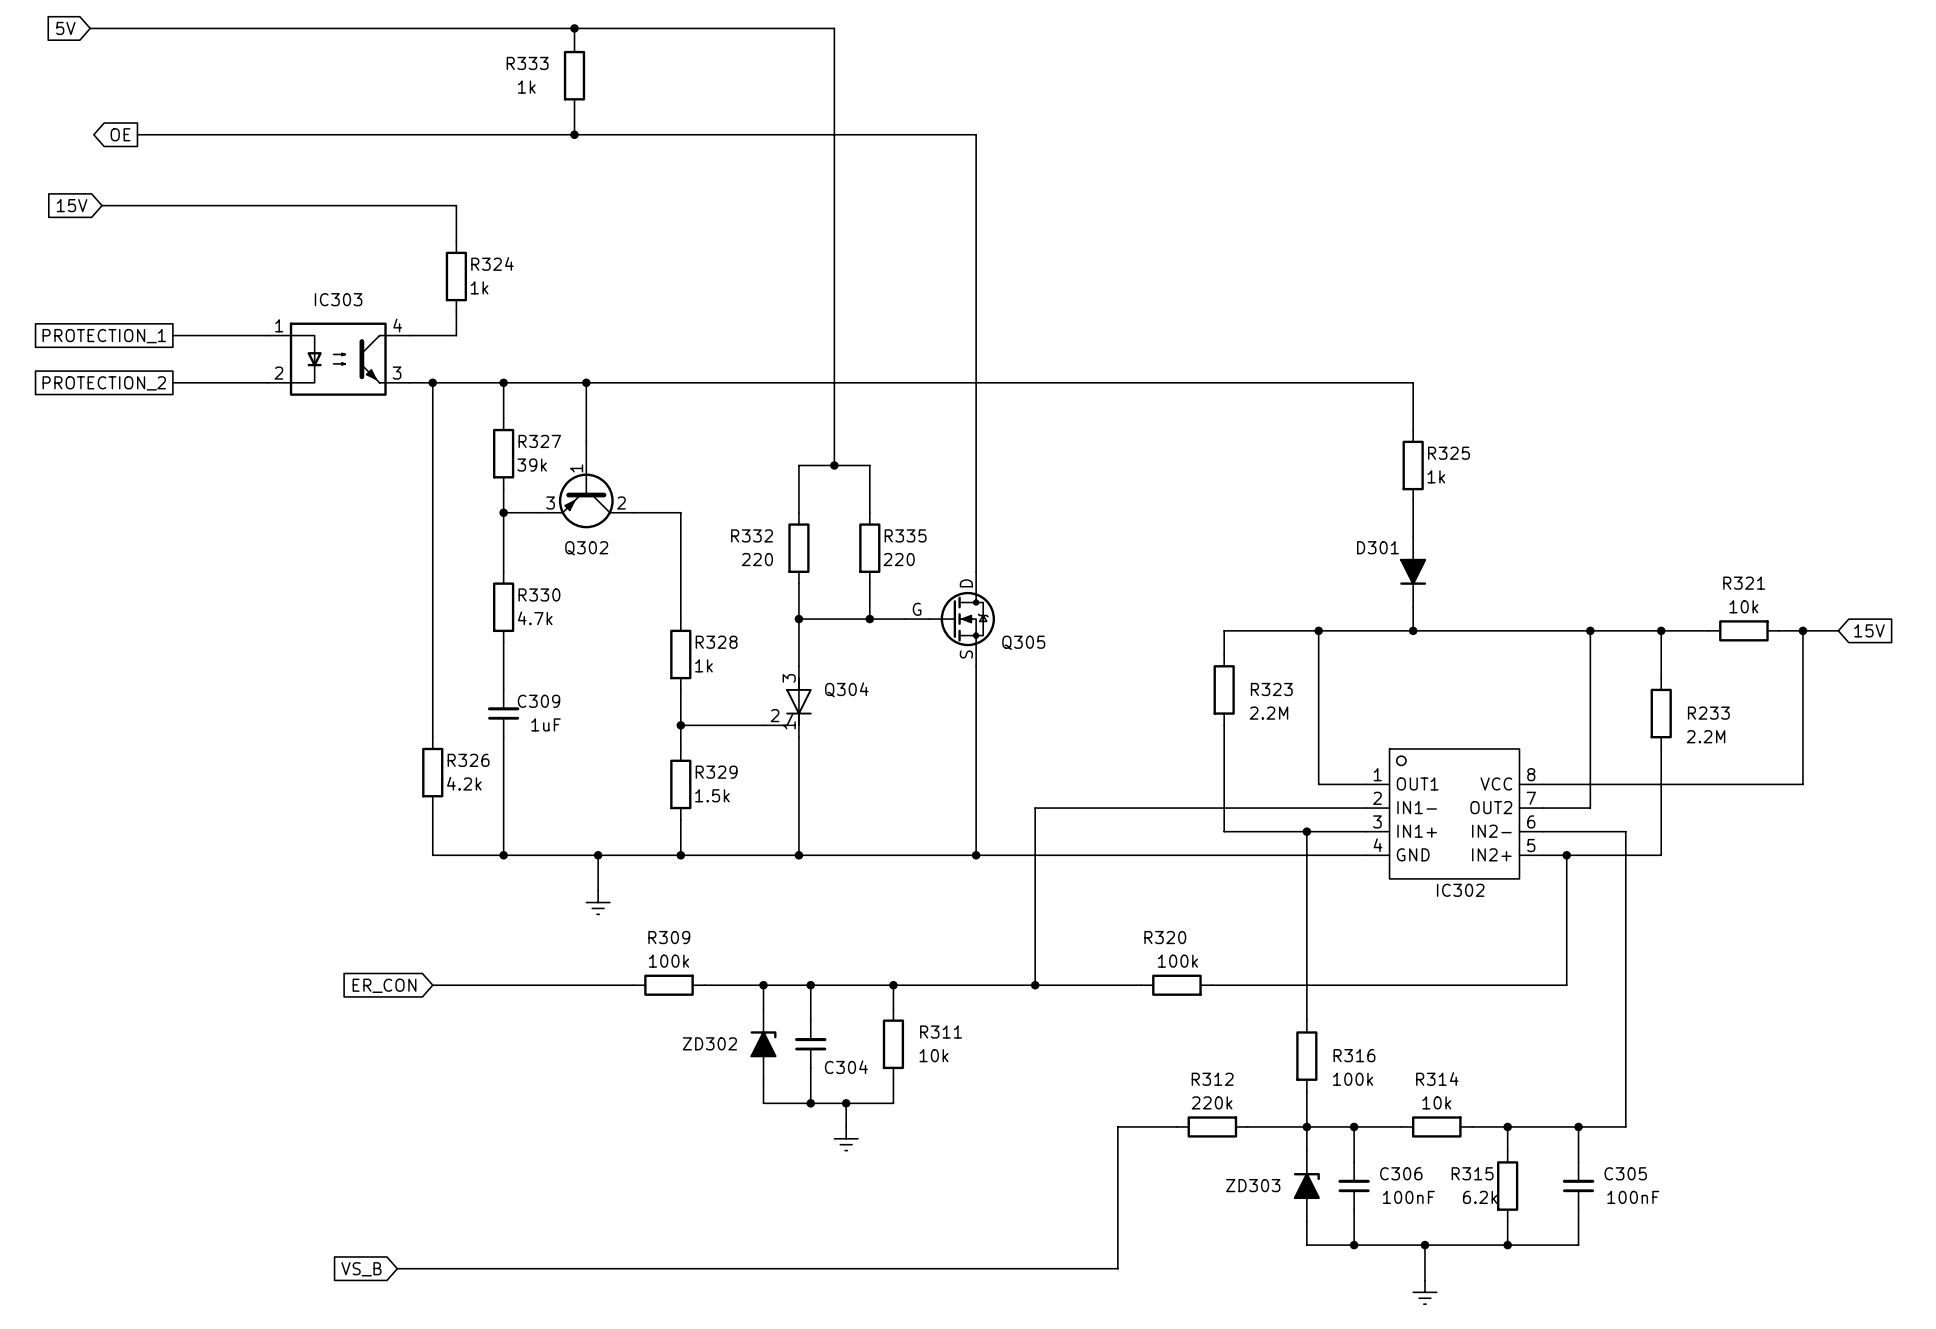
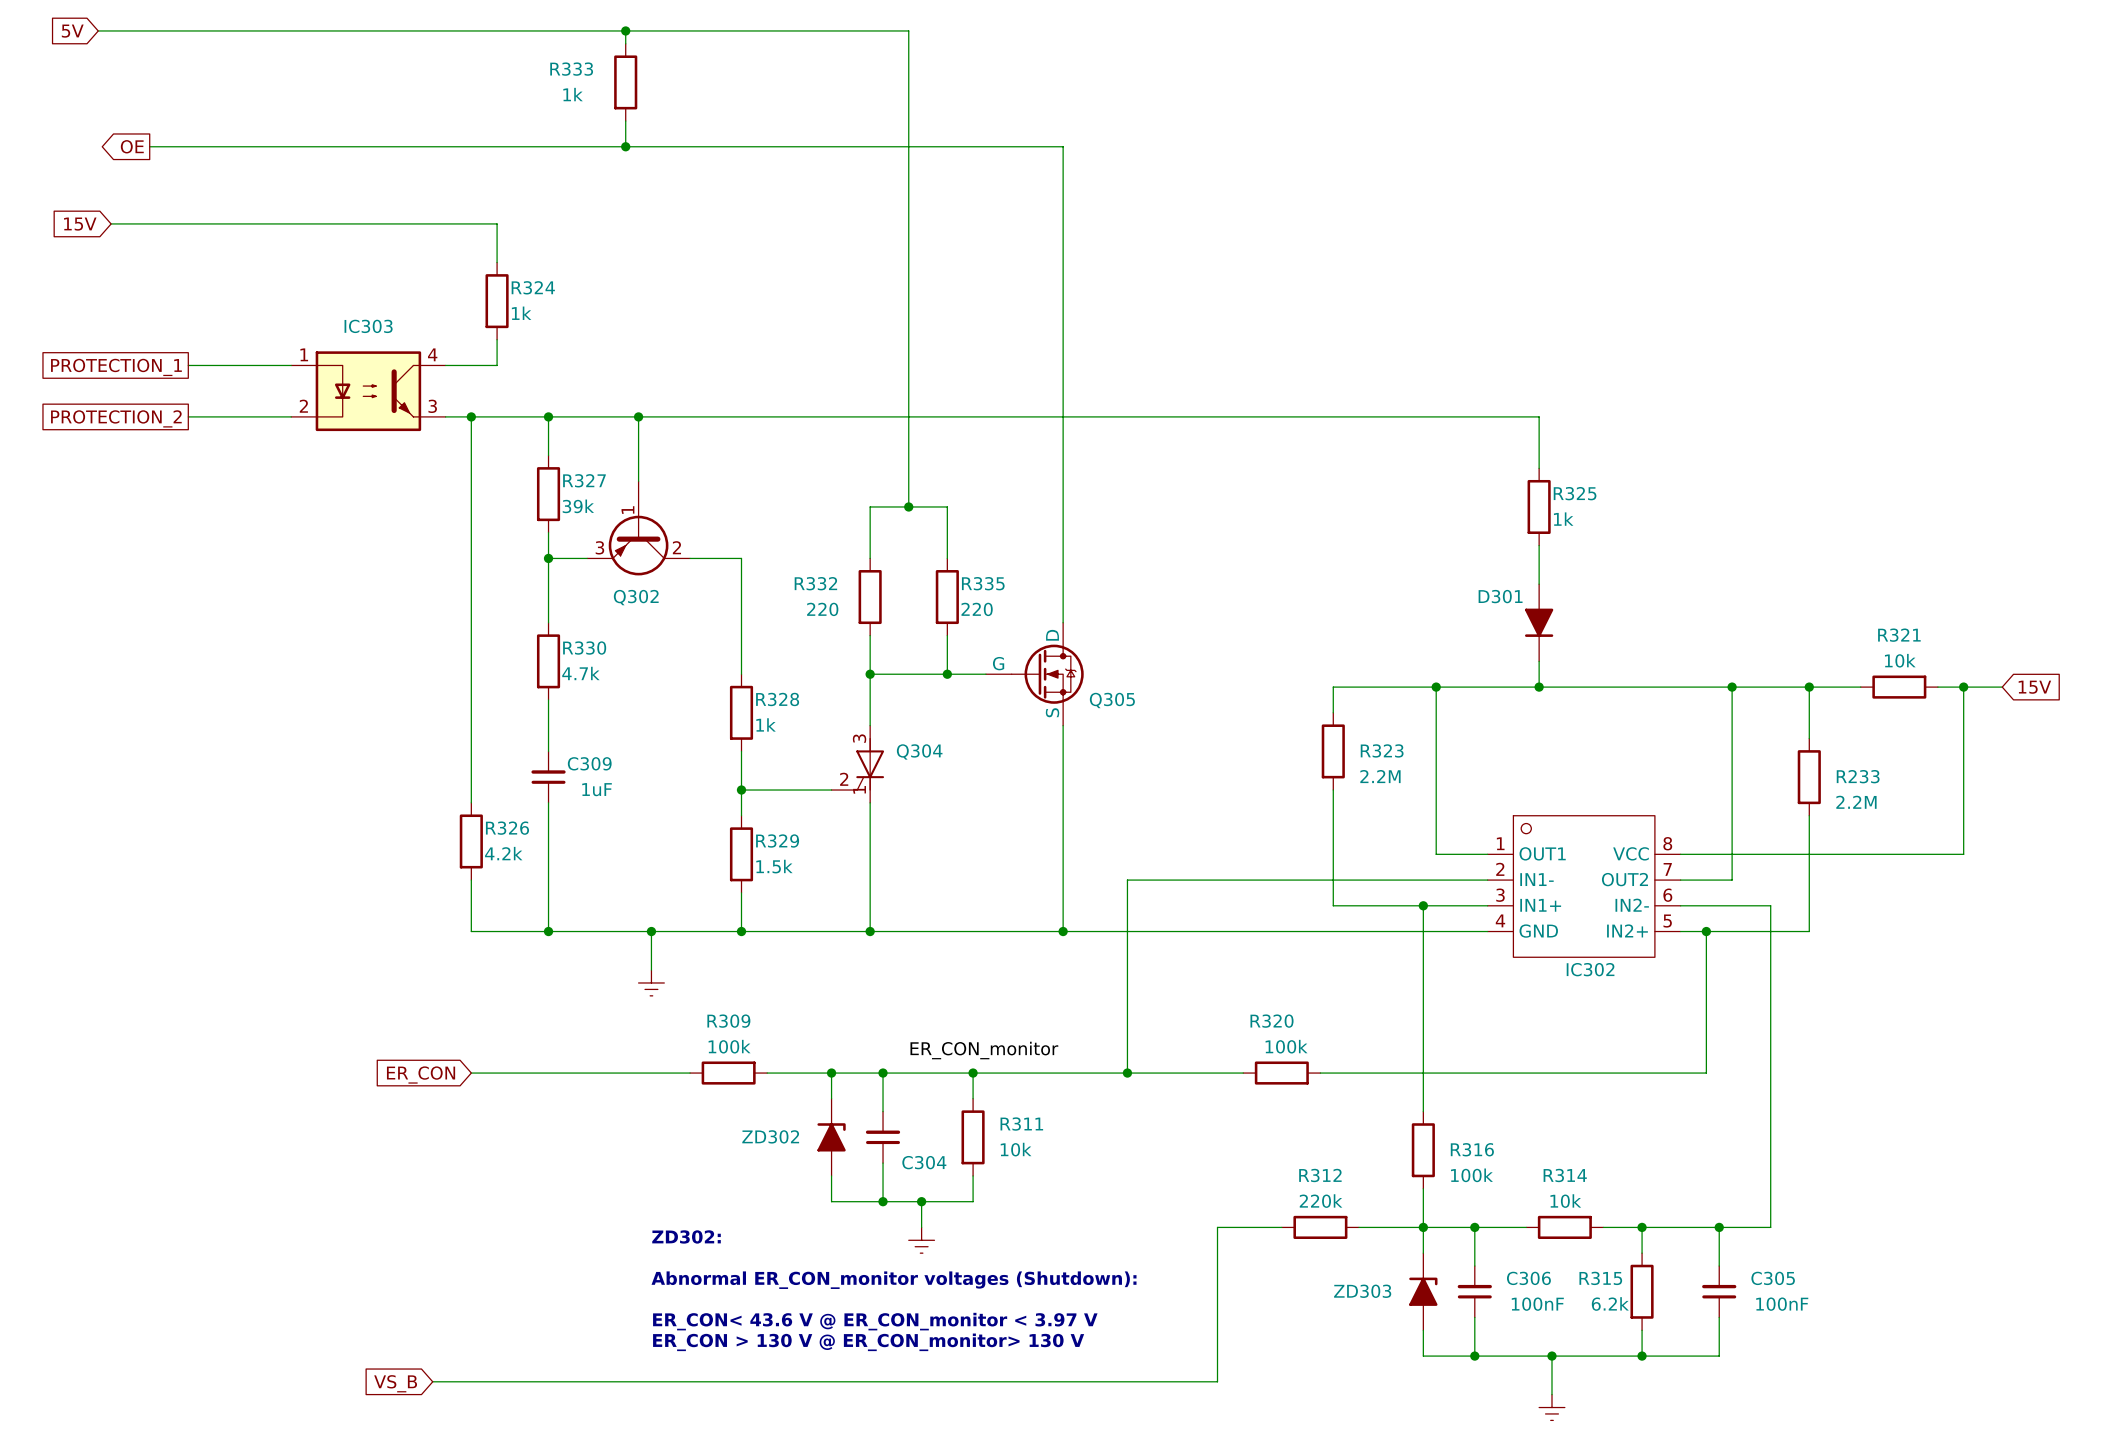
label: none -> ER_CON_monitor (984, 1050)
text: none -> ZD302: (686, 1236)
text: none -> Abnormal ER_CON_monitor voltages (Shutdown): (894, 1280)
text: none -> ER_CON< 43.6 V @ ER_CON_monitor < 3.97 V (875, 1321)
text: none -> ER_CON > 130 V @ ER_CON_monitor> 130 V (868, 1342)

